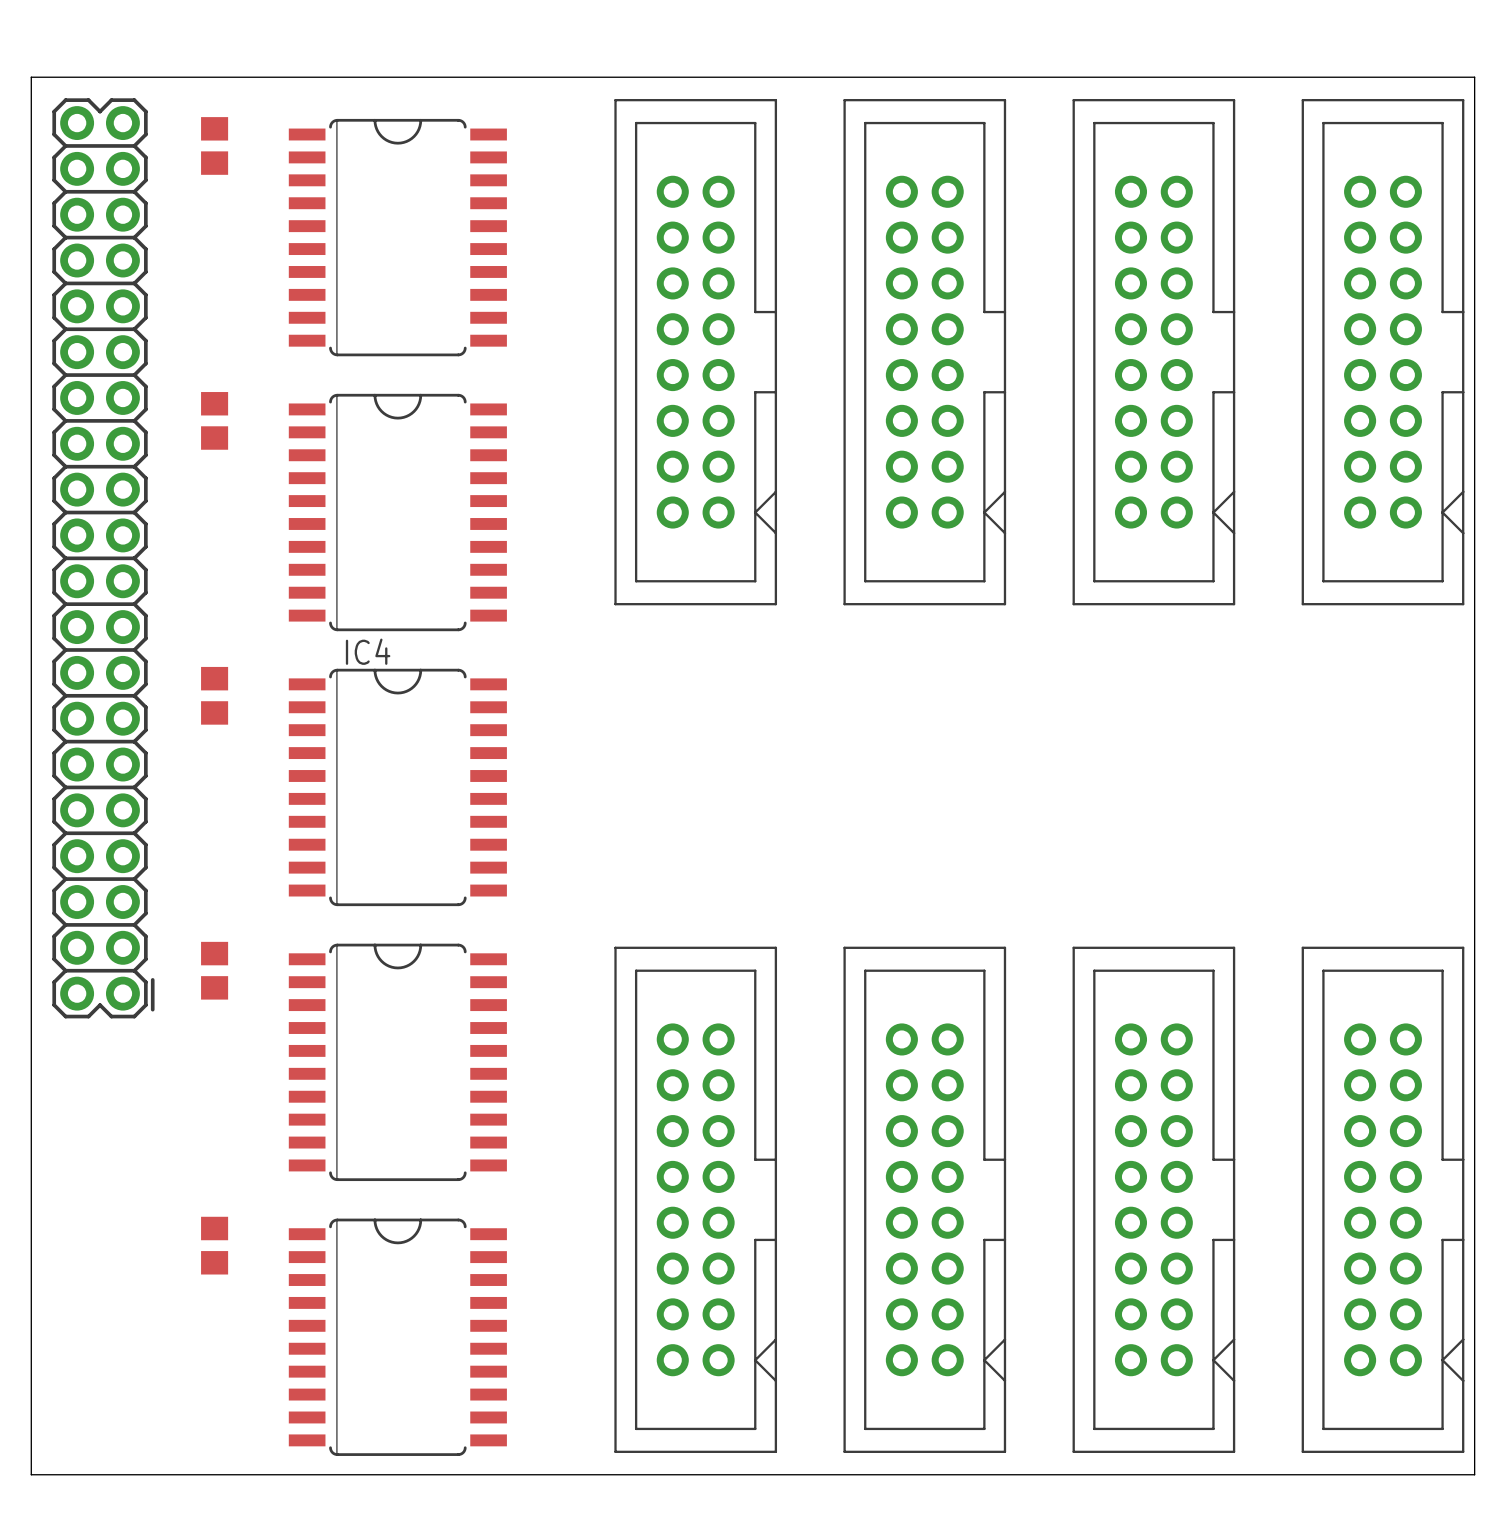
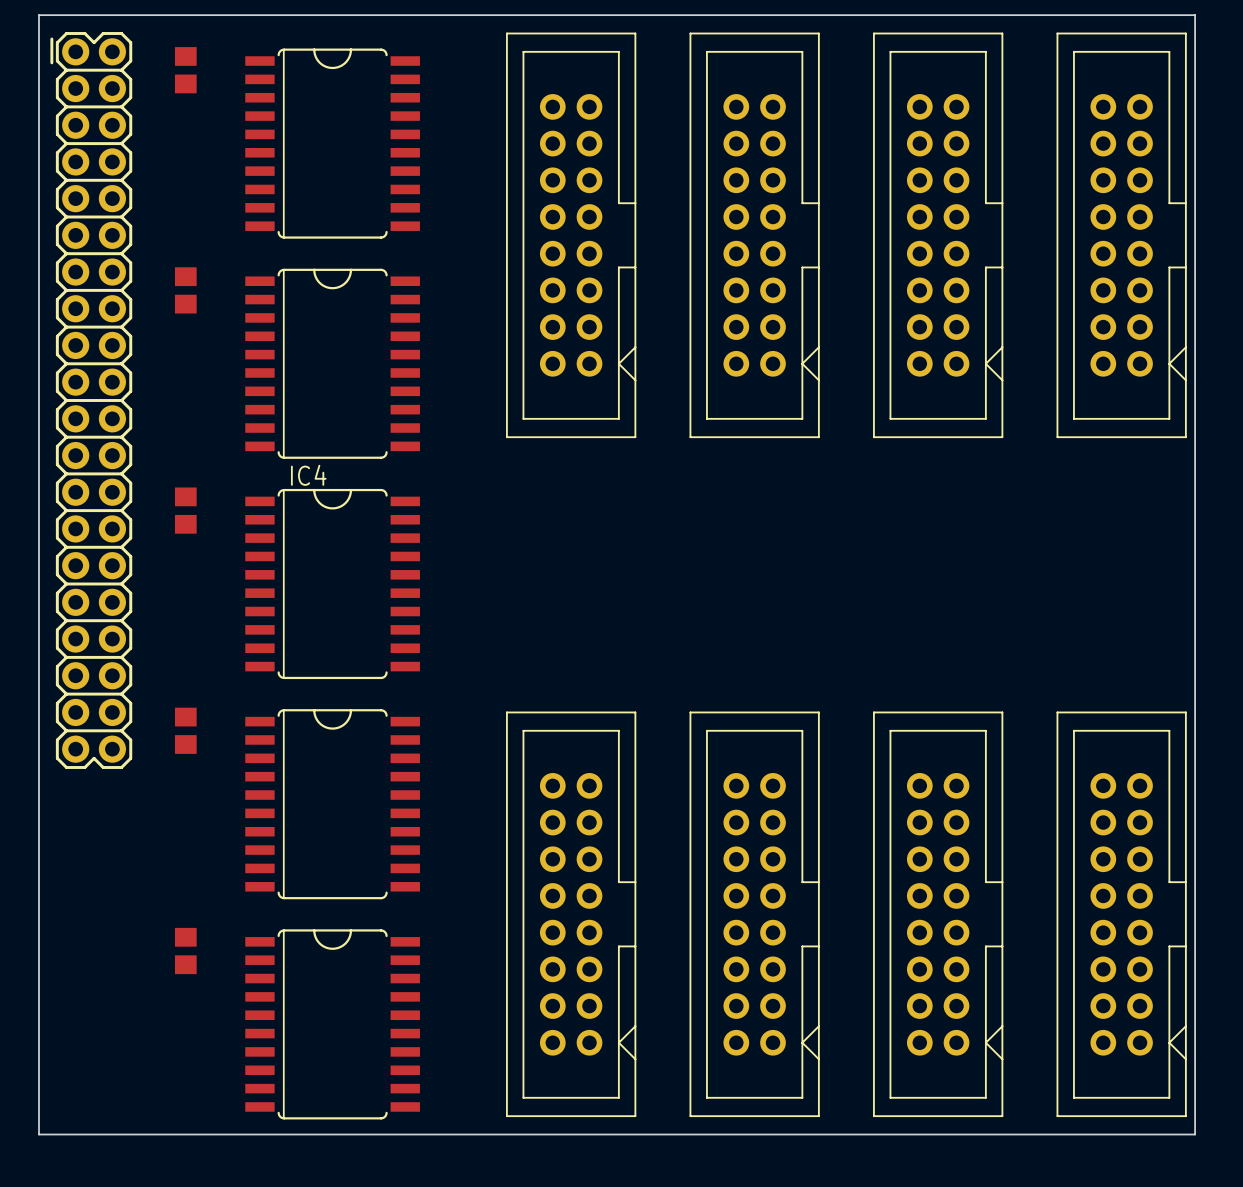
part rotation: 0° (103, 558) -> 180° (91, 400)

